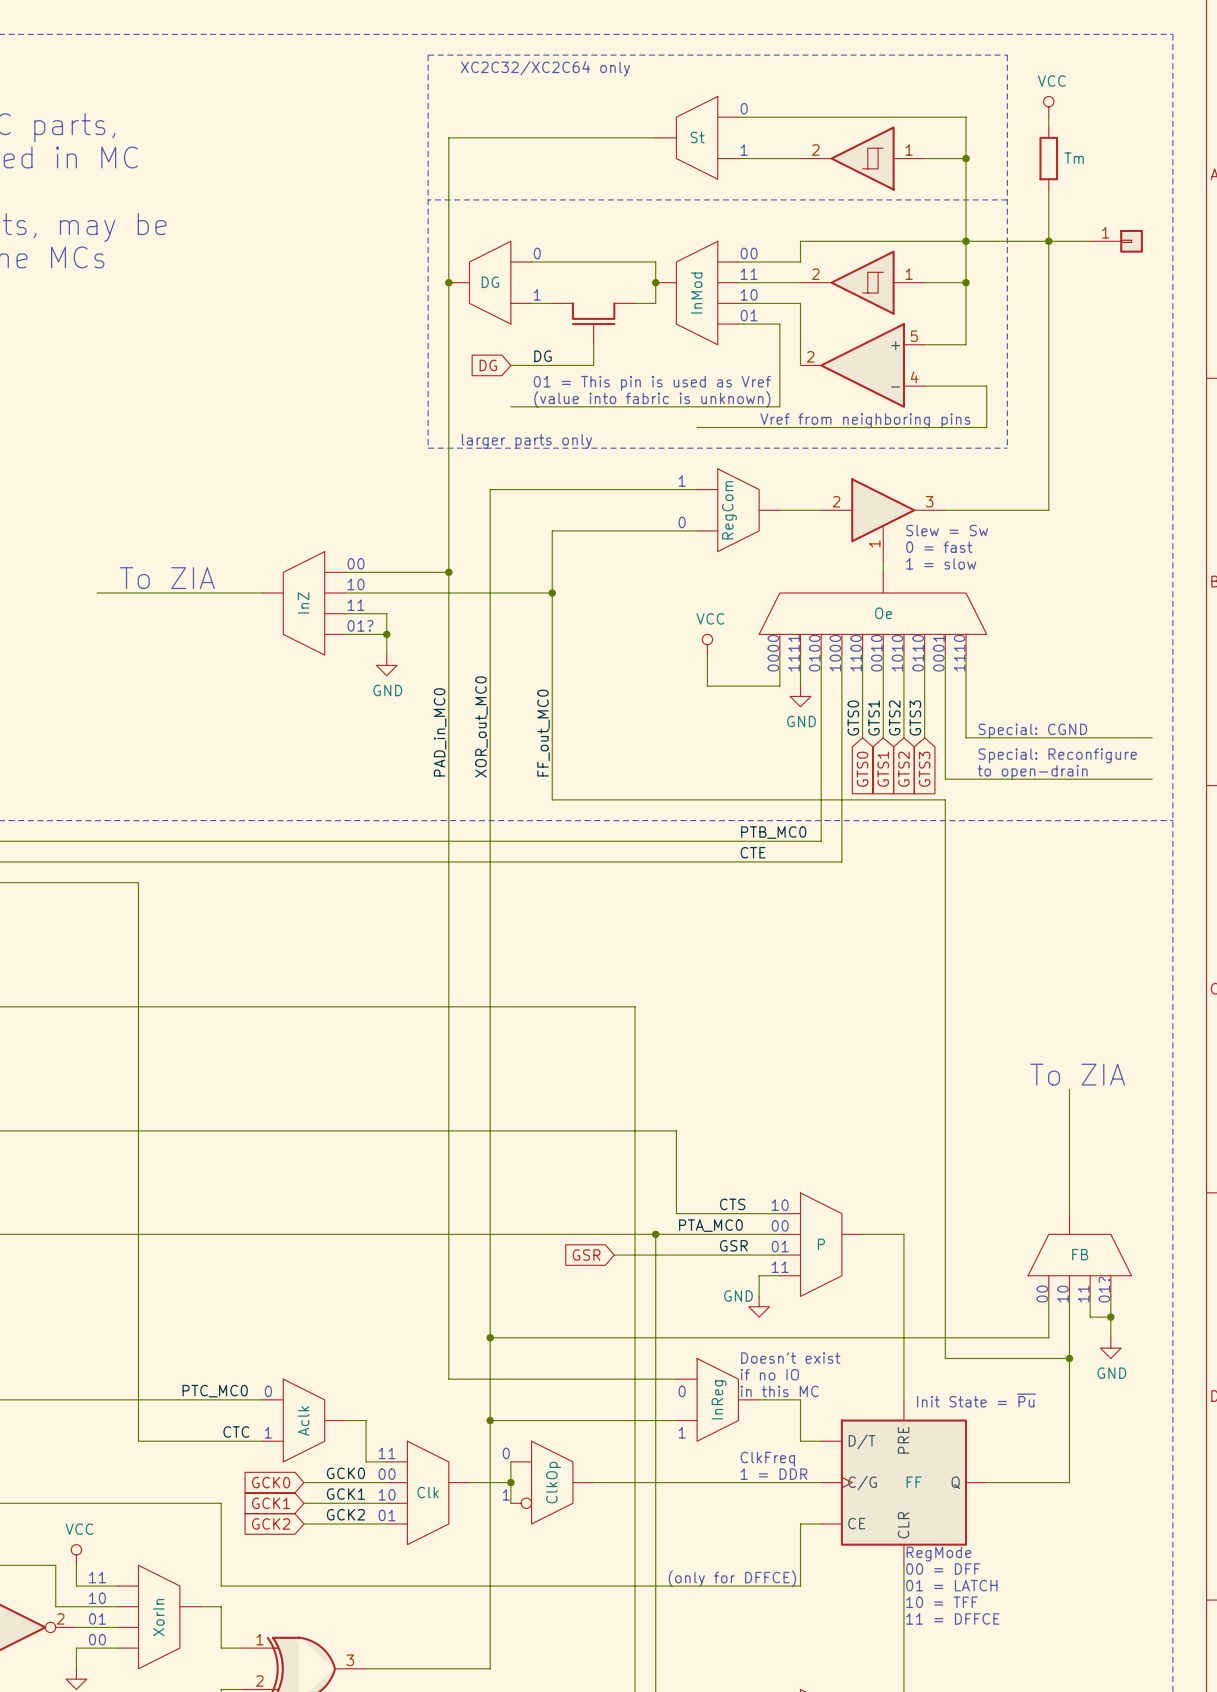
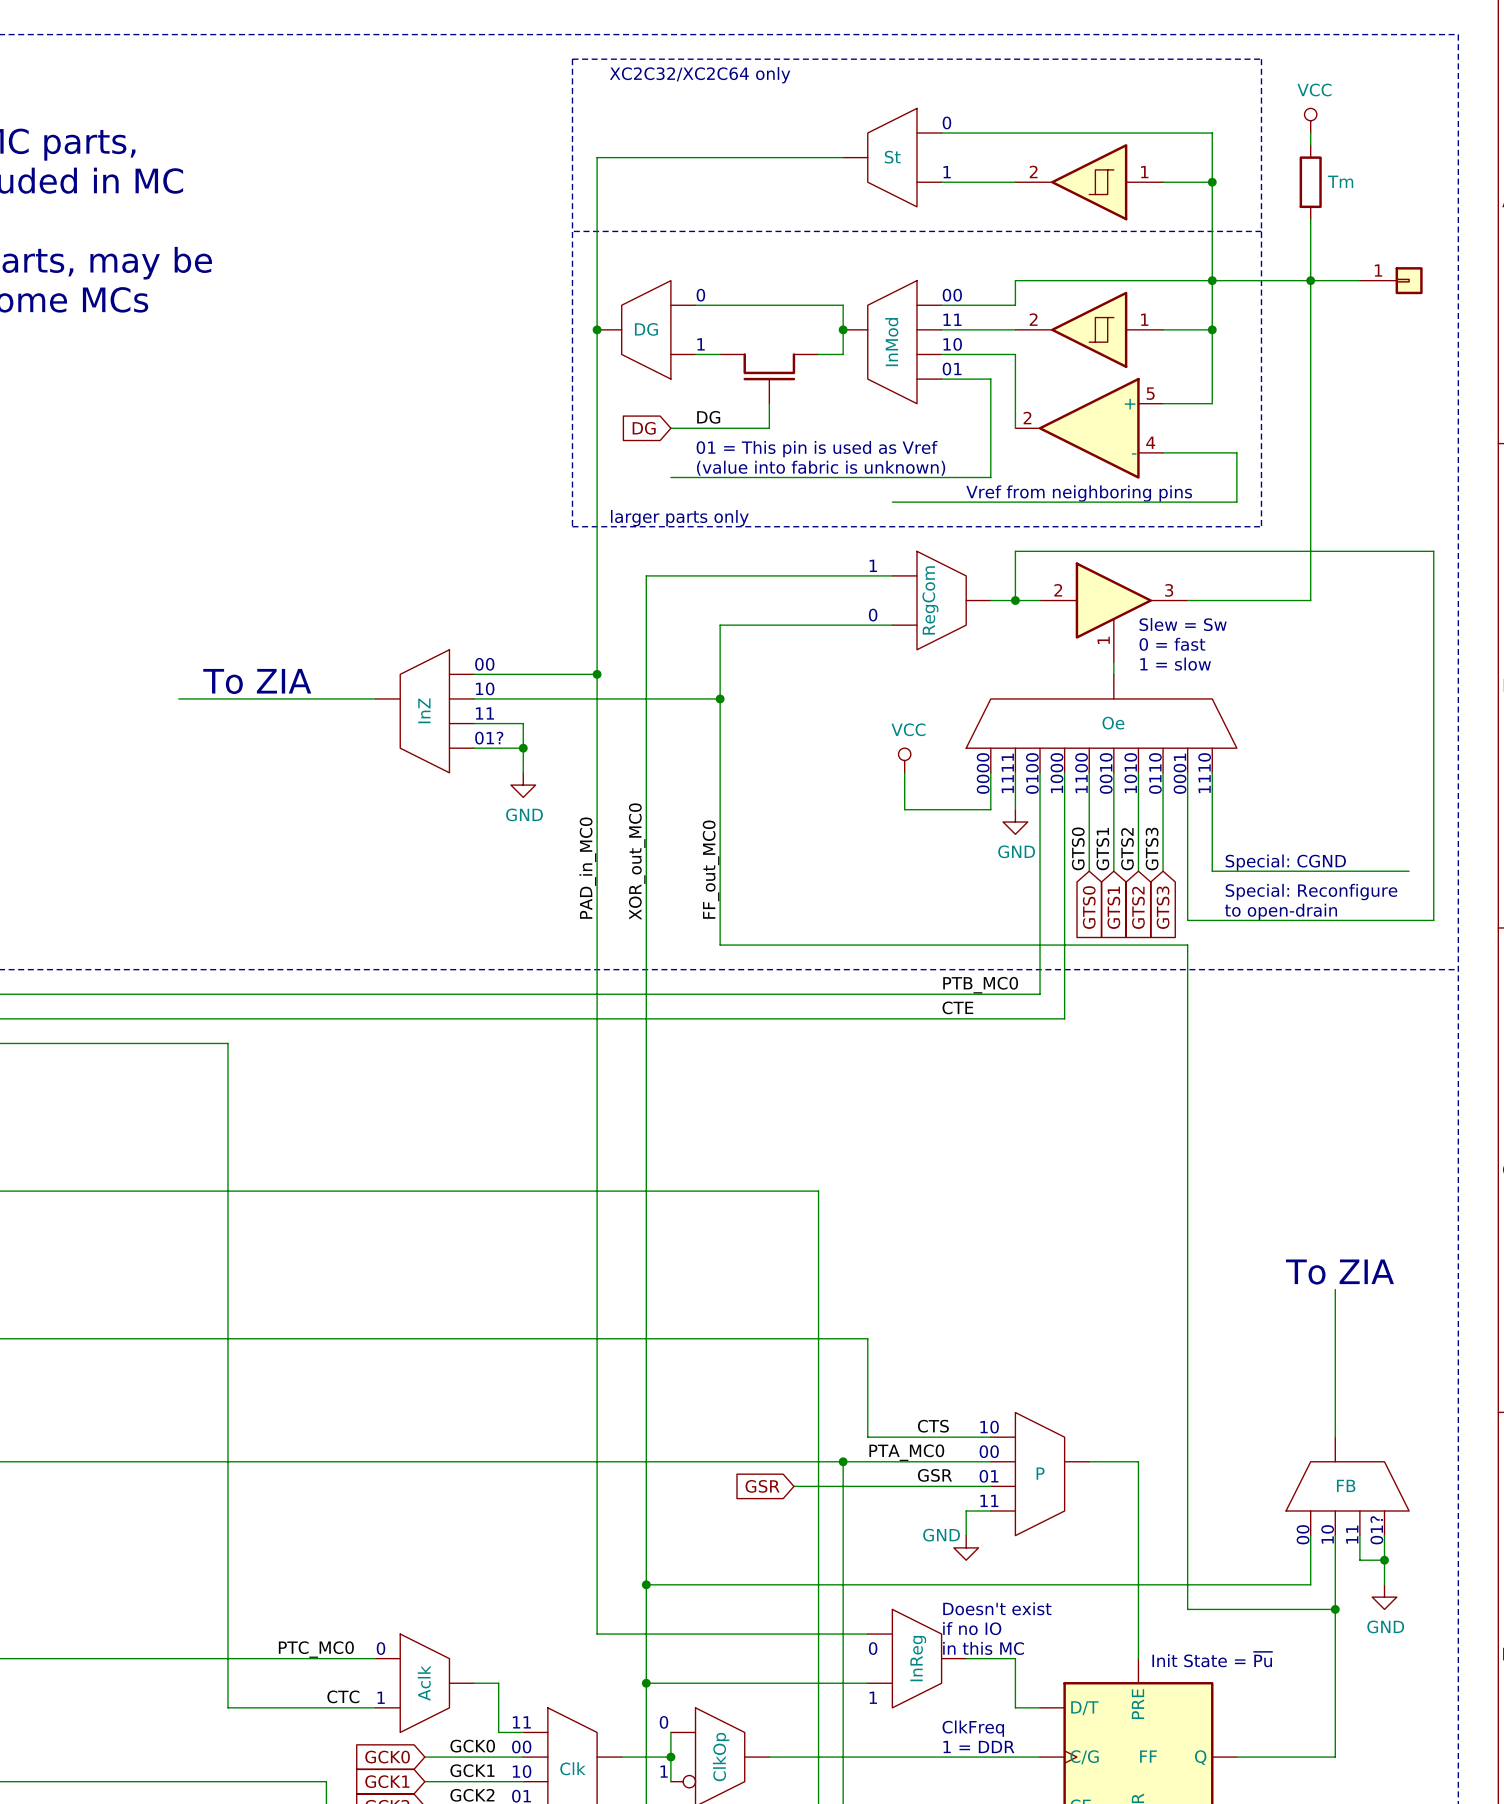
wire: none -> (1015, 600) (1015, 551) (1433, 551) (1433, 920)
junction: none -> (1015, 600)
wire: (1131, 737) (1152, 737) -> none

